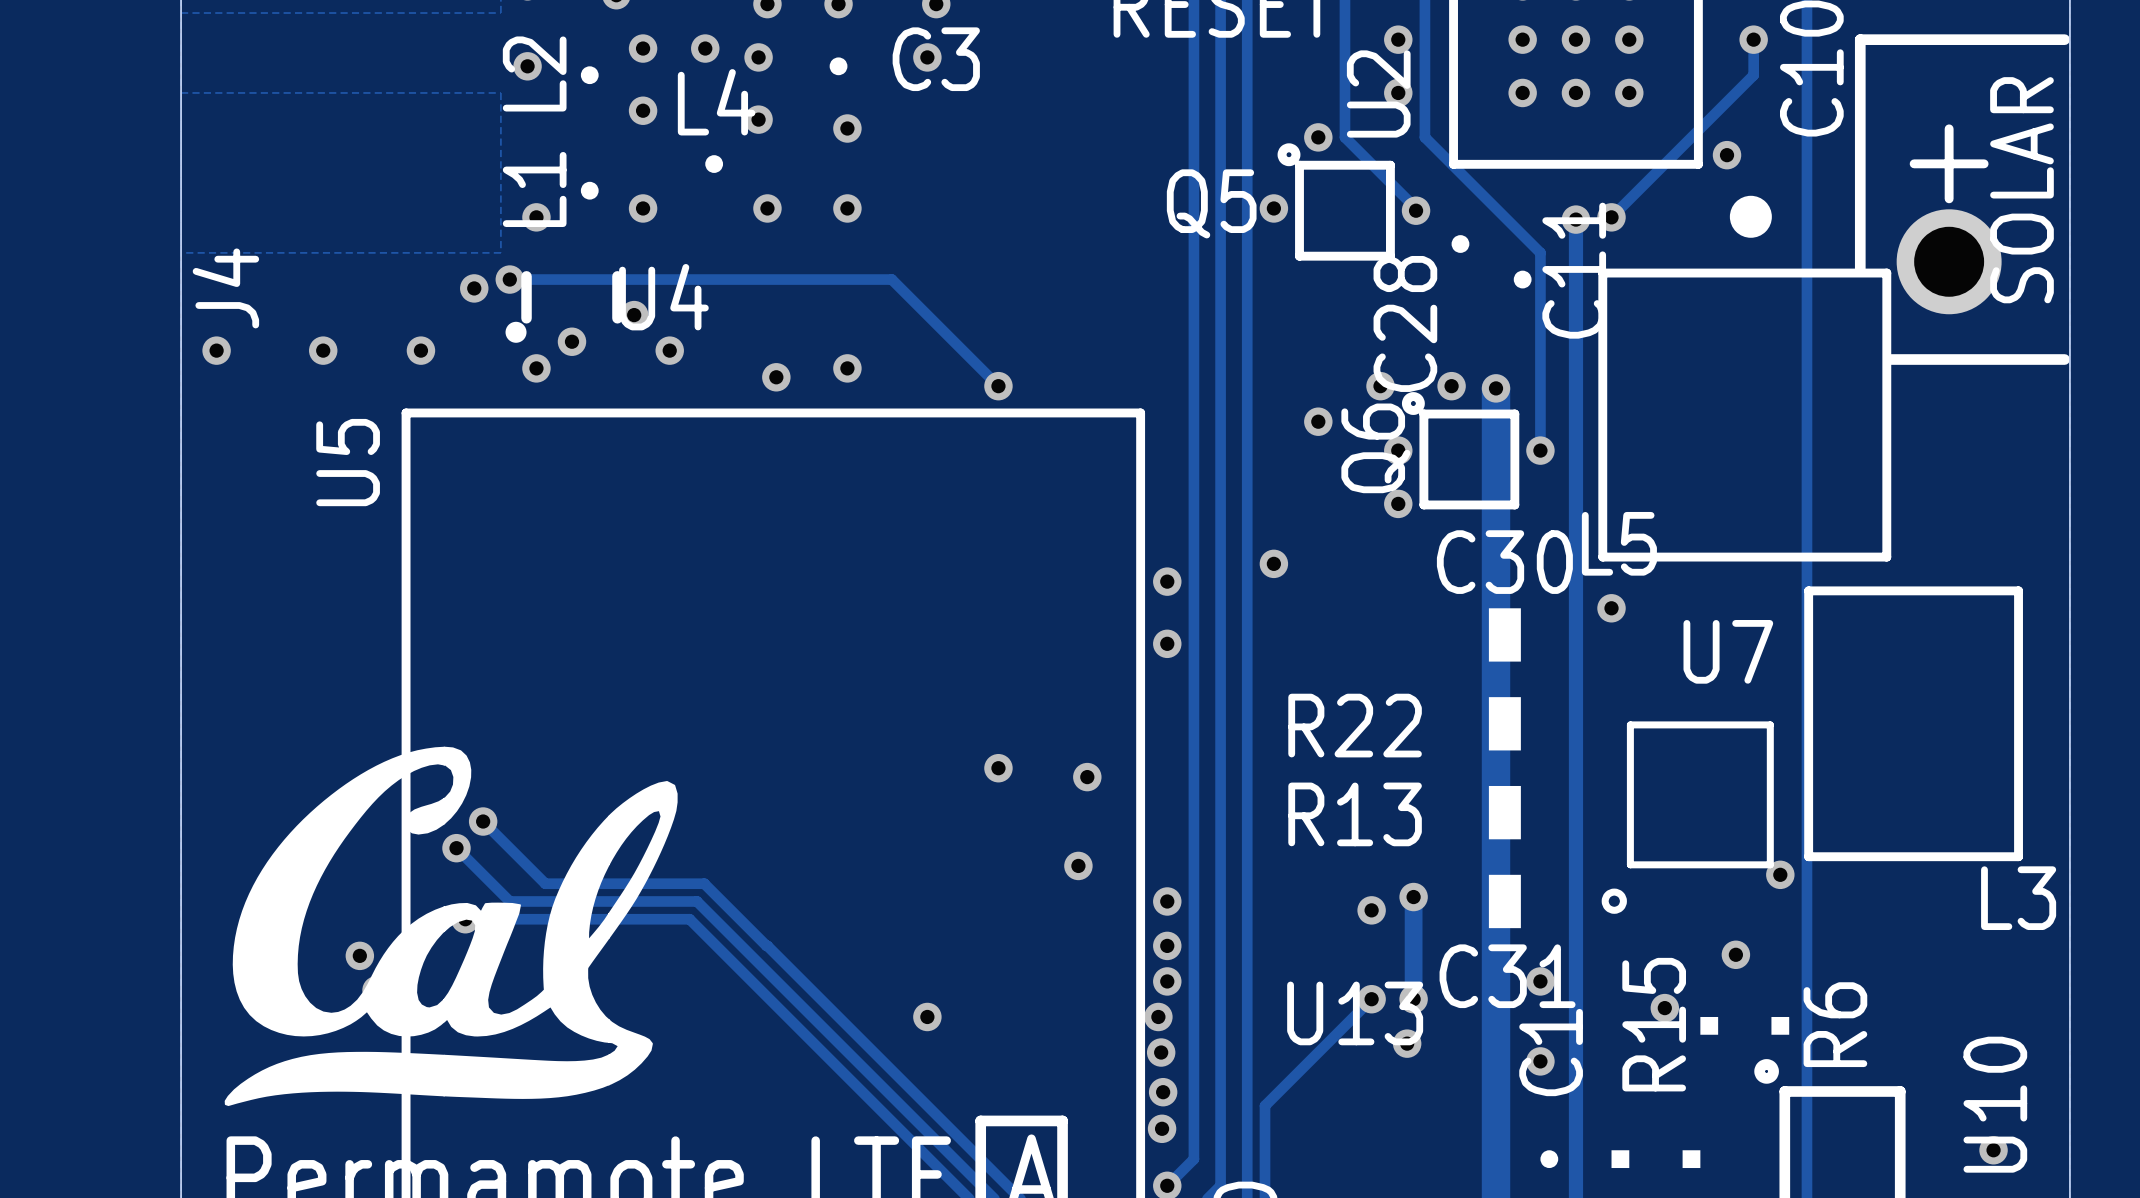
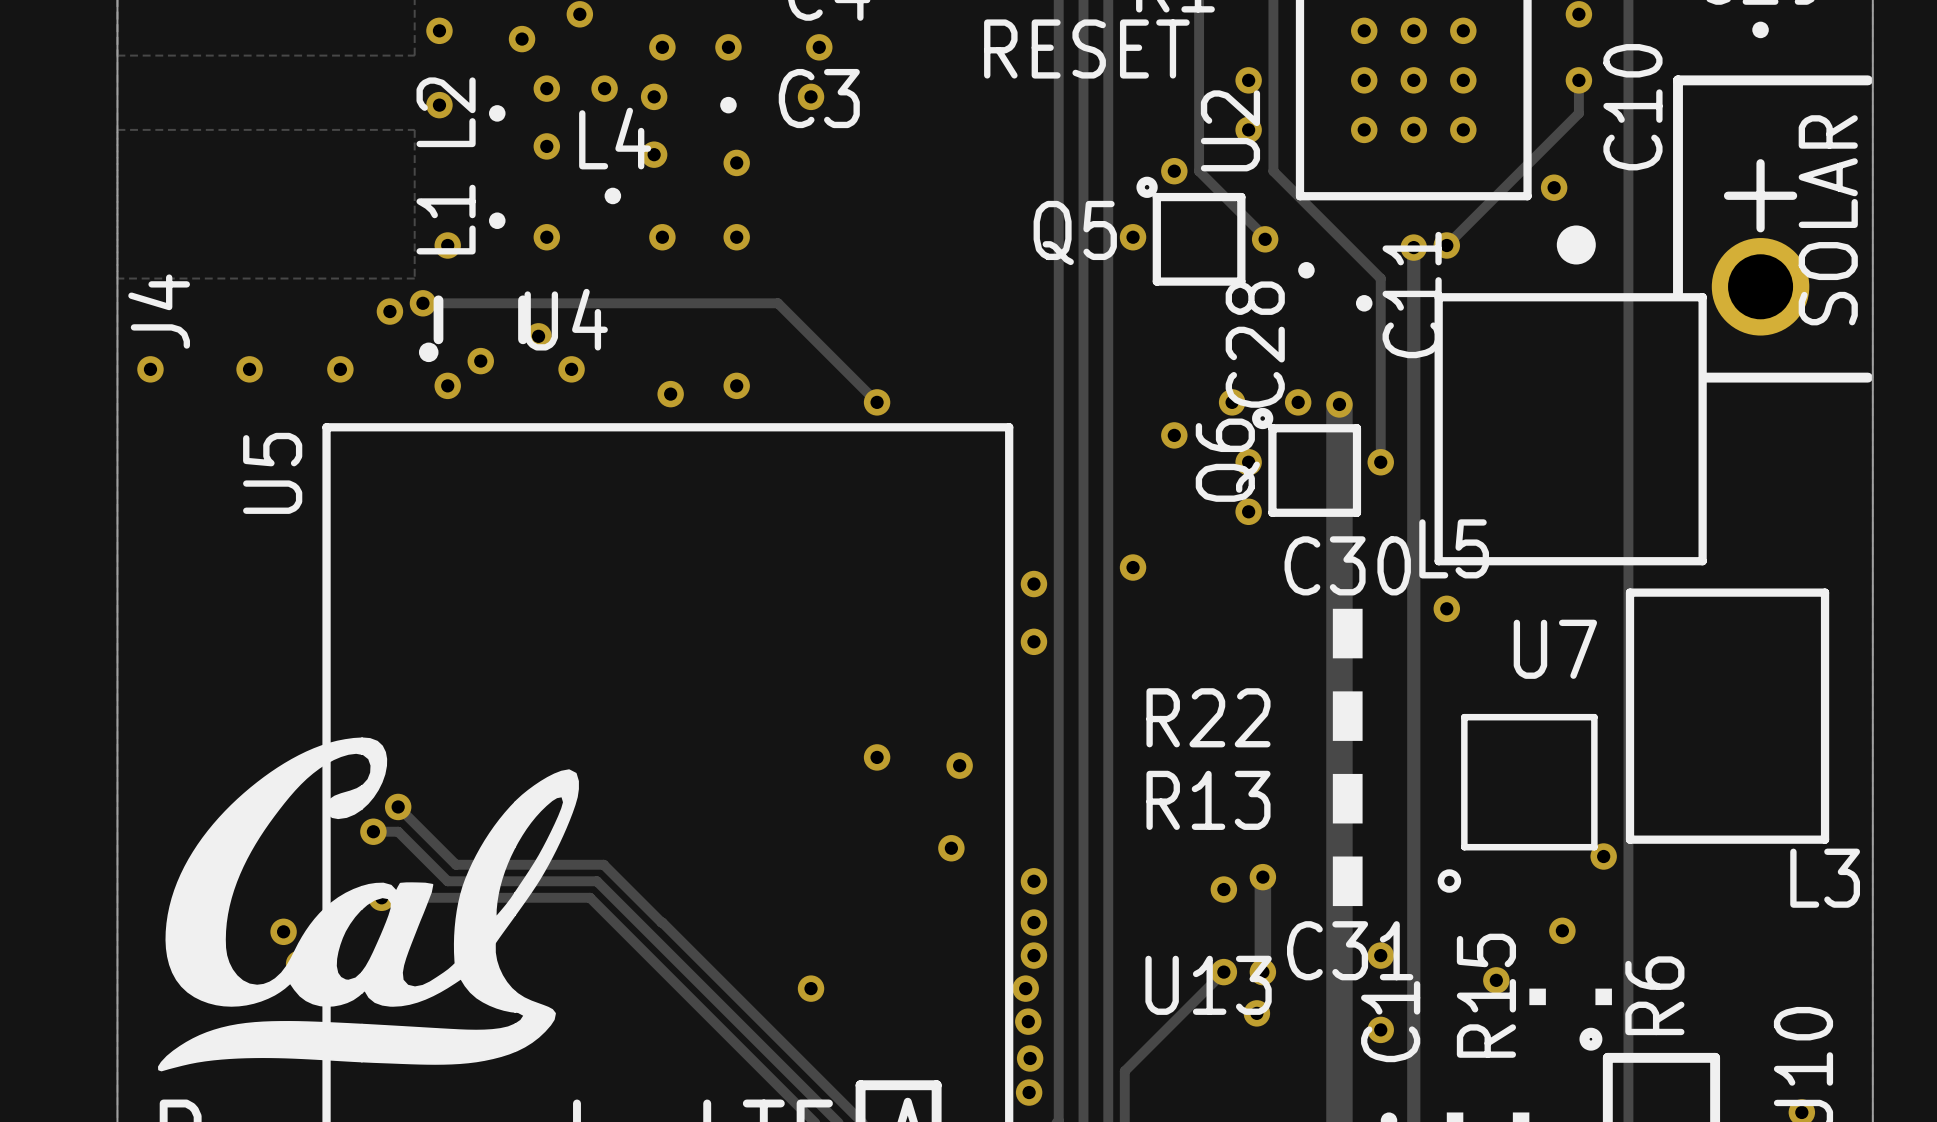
track: (456, 848) (509, 901) (536, 901) -> (373, 831) (398, 831) (447, 881)

